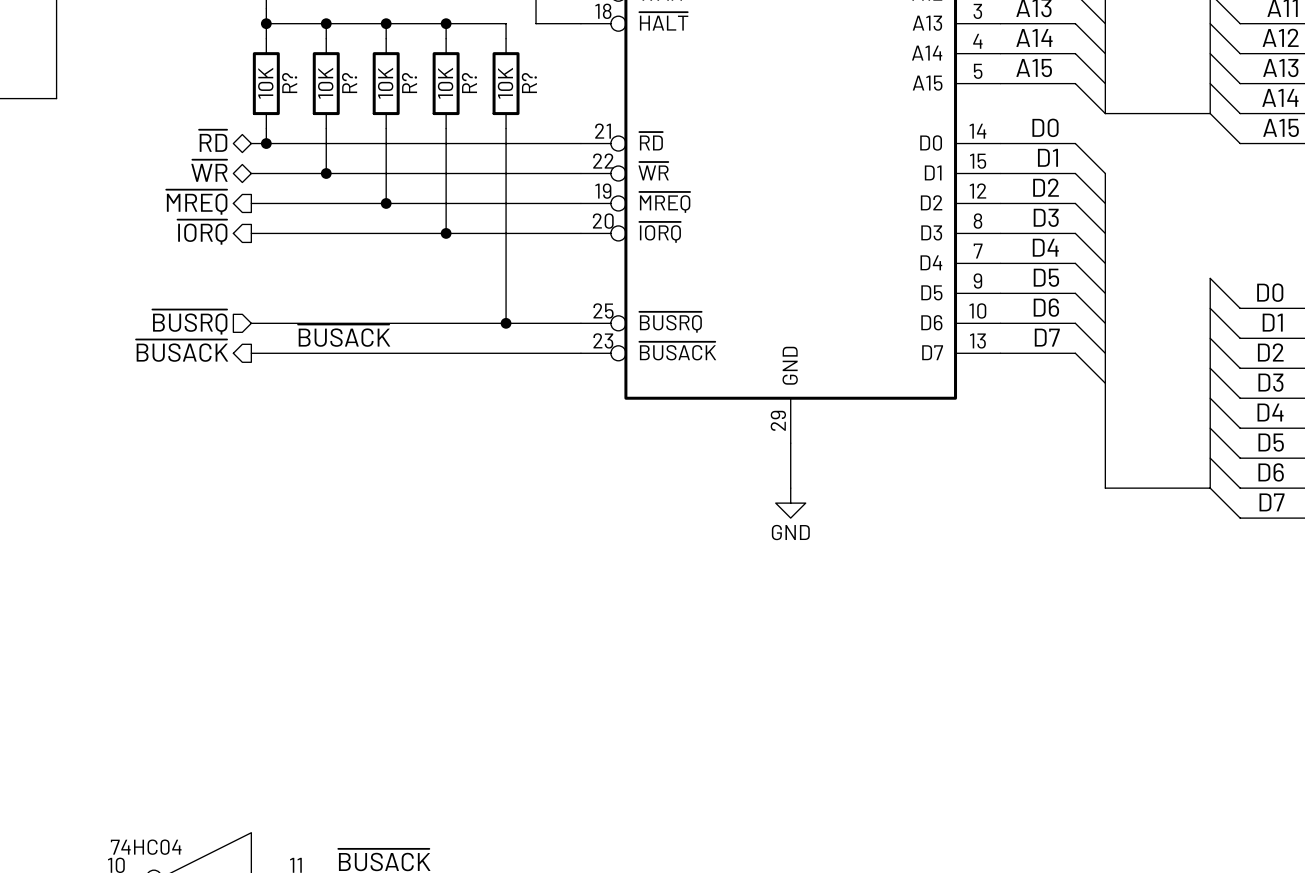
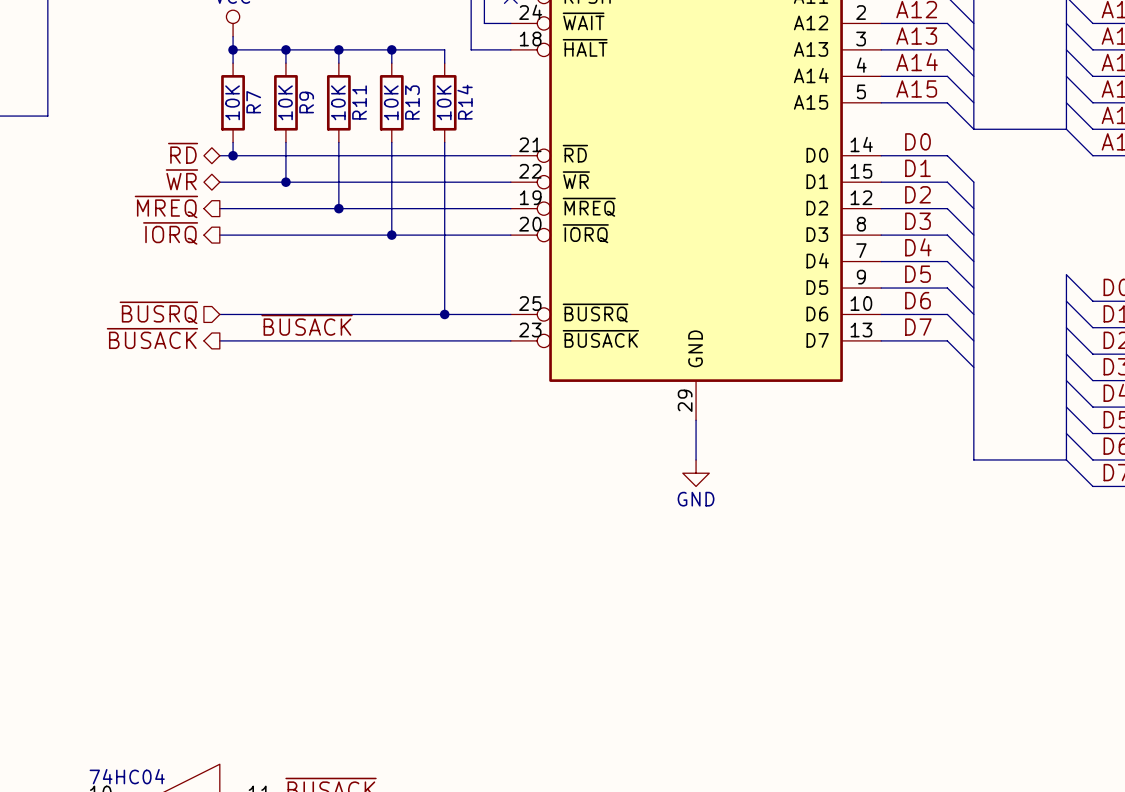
R? name: R? (289, 83) -> R7 (253, 102)
R? name: R? (349, 83) -> R9 (306, 102)
R? name: R? (409, 83) -> R11 (359, 102)
R? name: R? (469, 83) -> R13 (412, 102)
R? name: R? (529, 83) -> R14 (465, 102)

